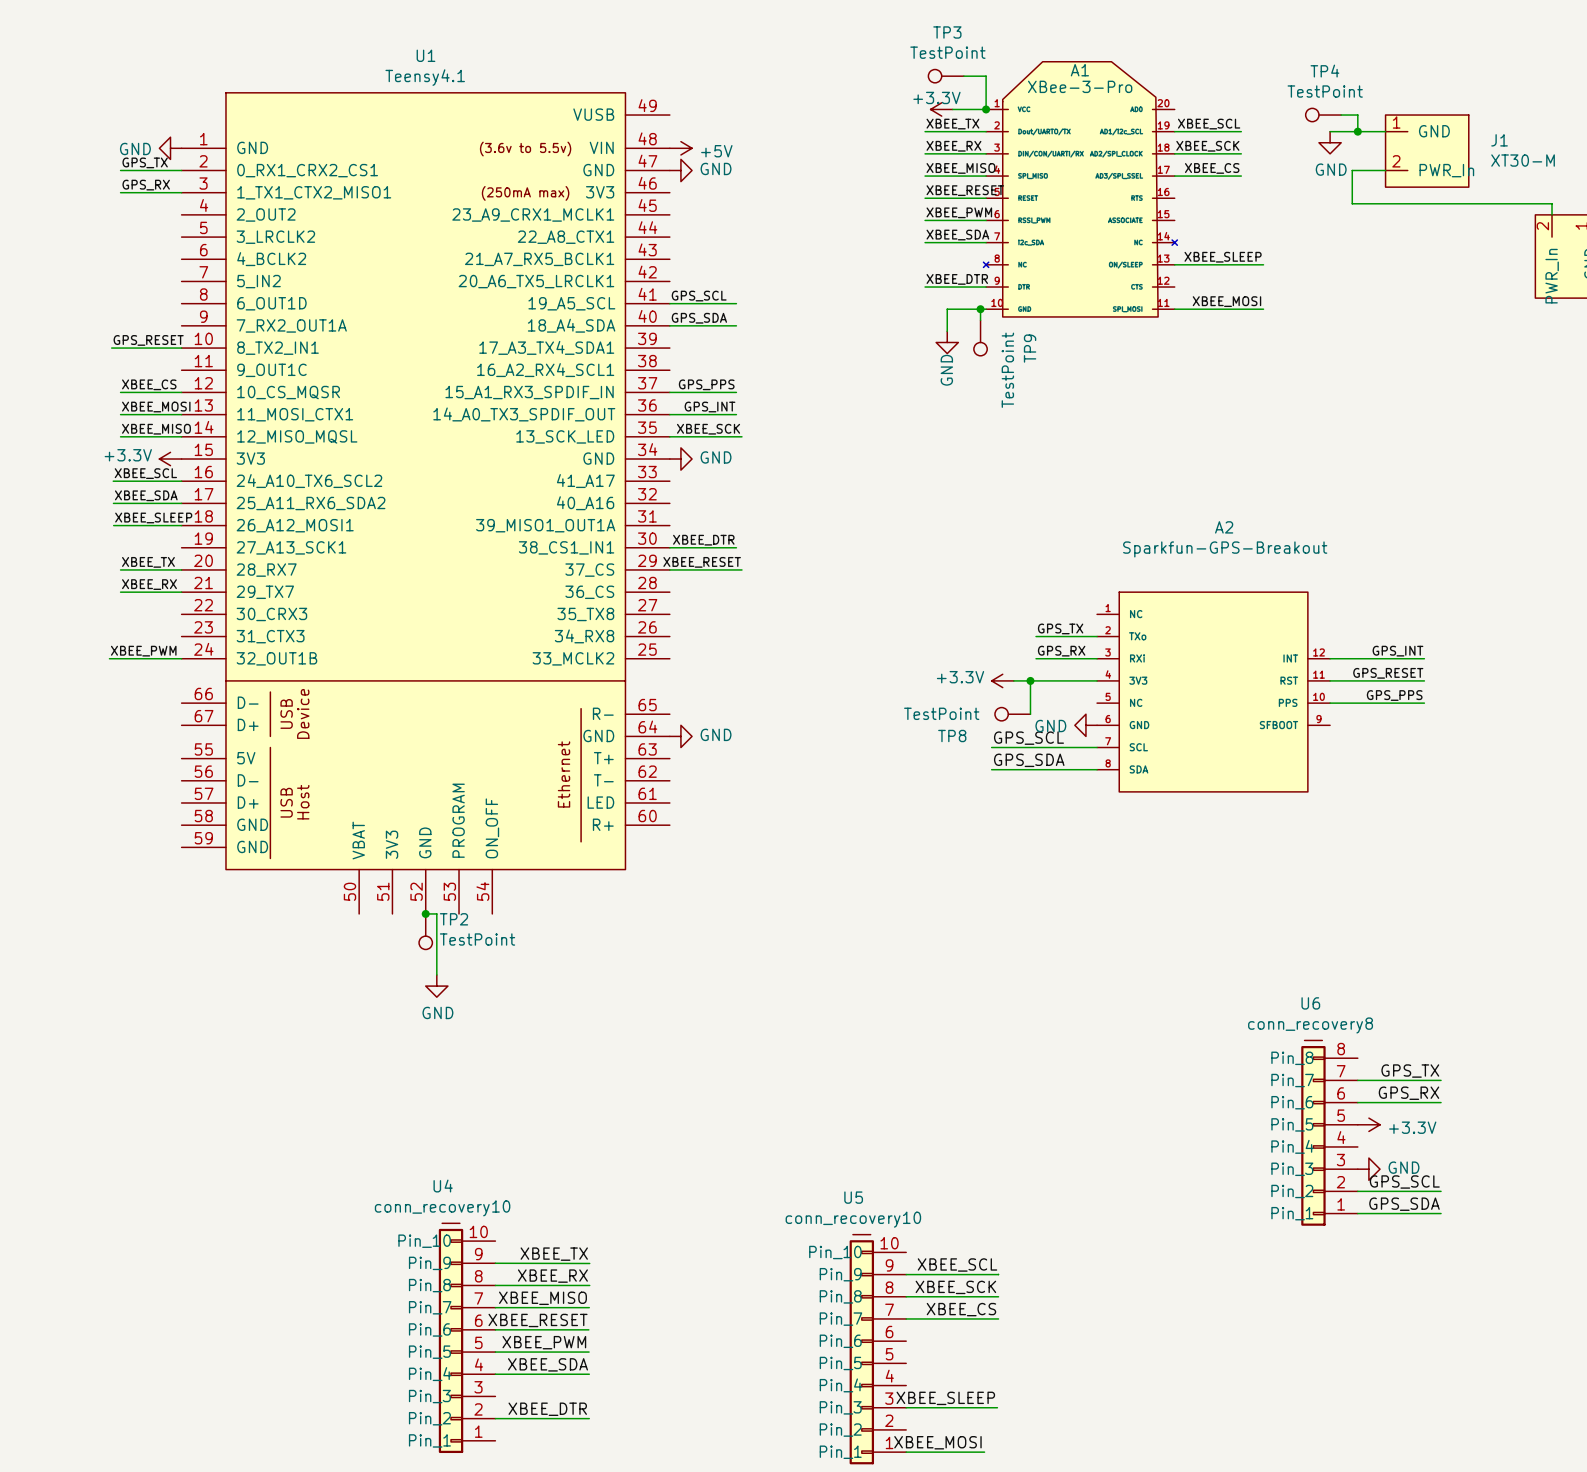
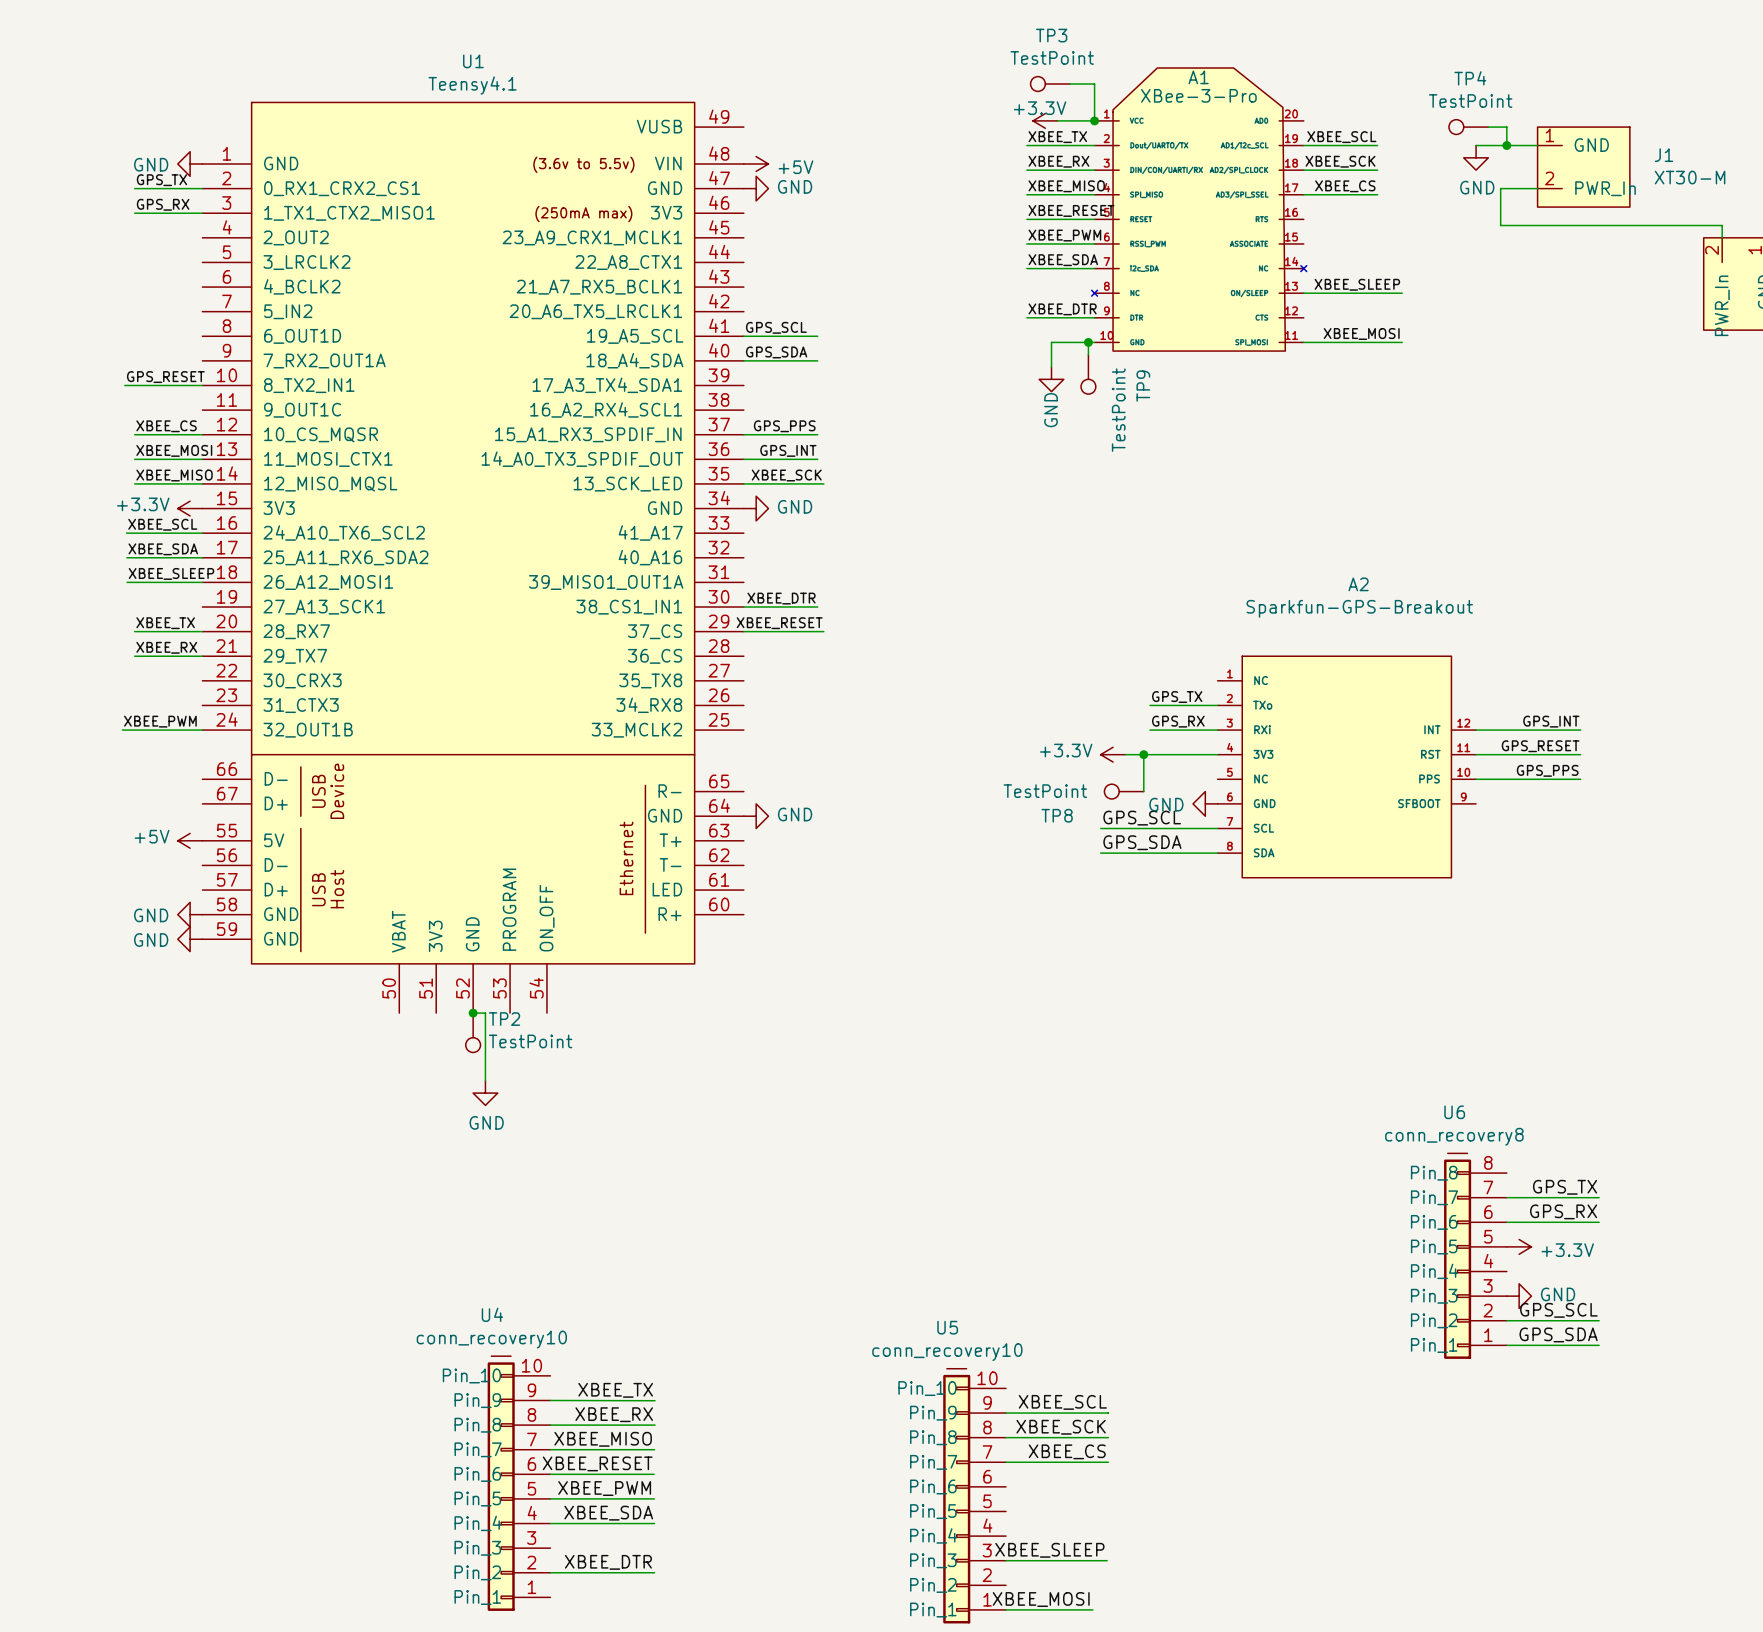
power symbol: none -> +5V (190, 840)
power symbol: none -> GND (190, 914)
power symbol: none -> GND (190, 939)

